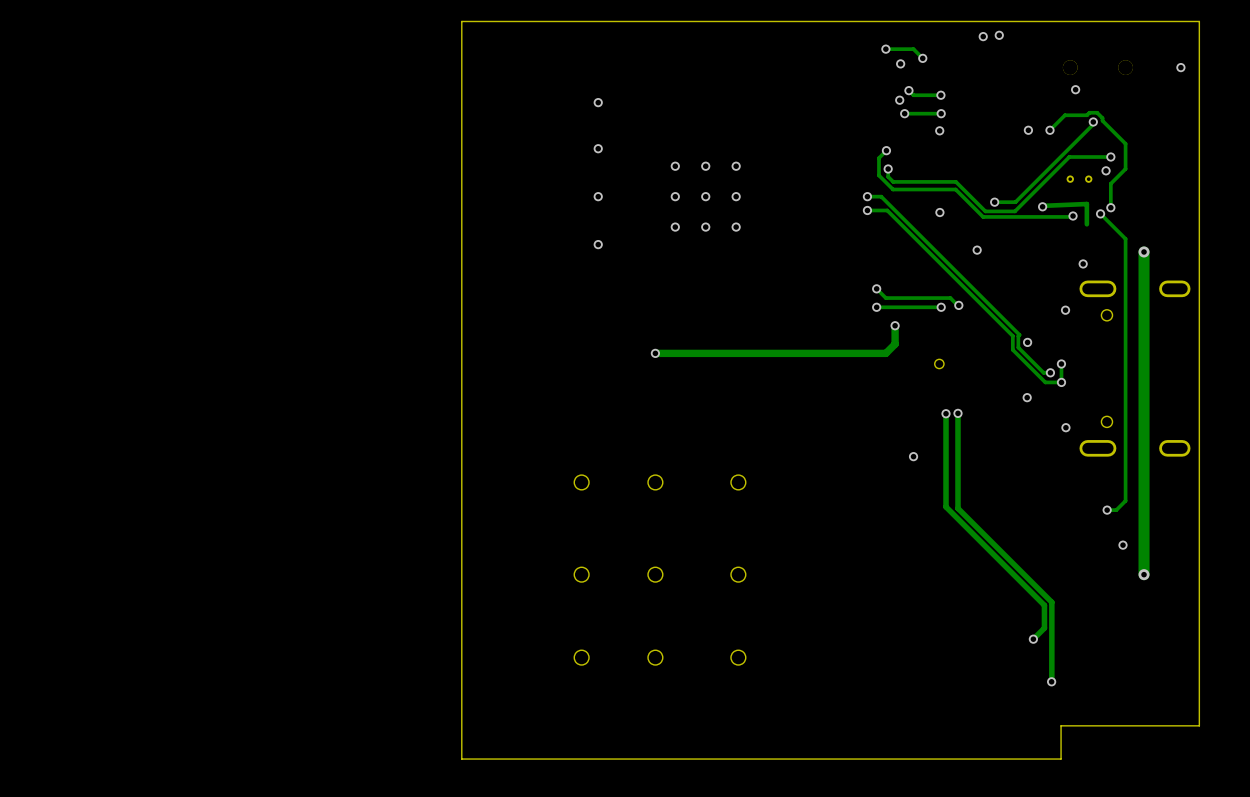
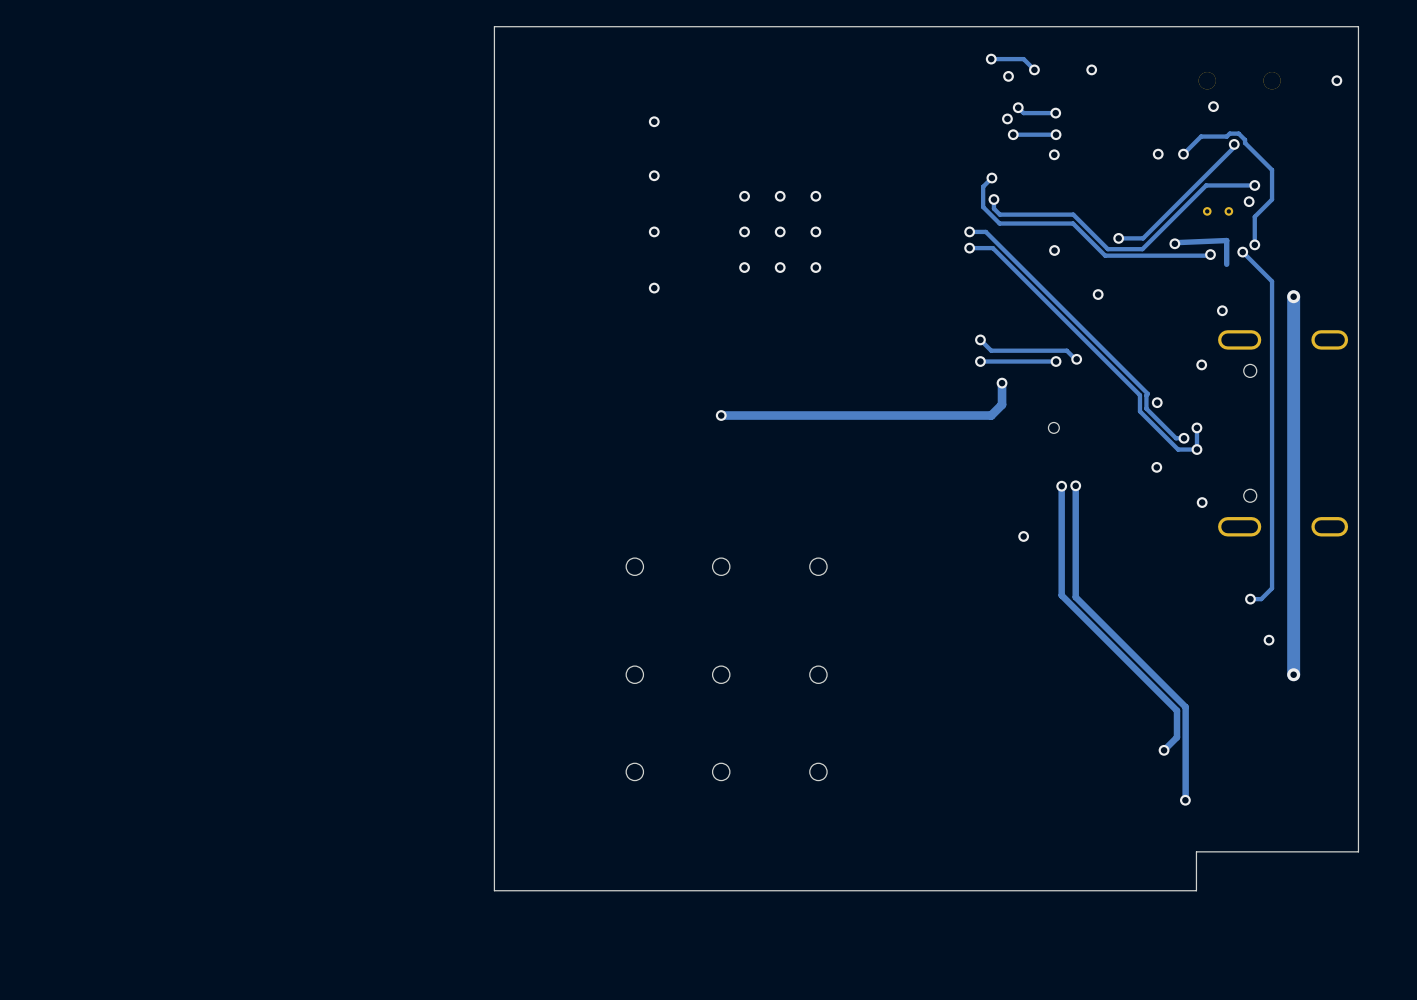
via: (999, 35) -> none
via: (983, 36) -> none
via: none -> (1091, 69)

